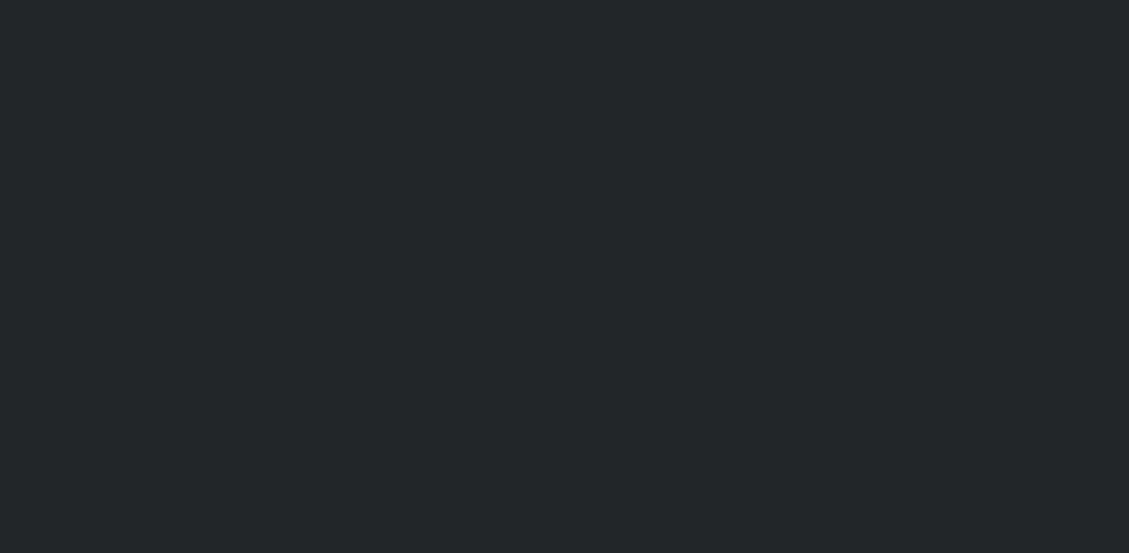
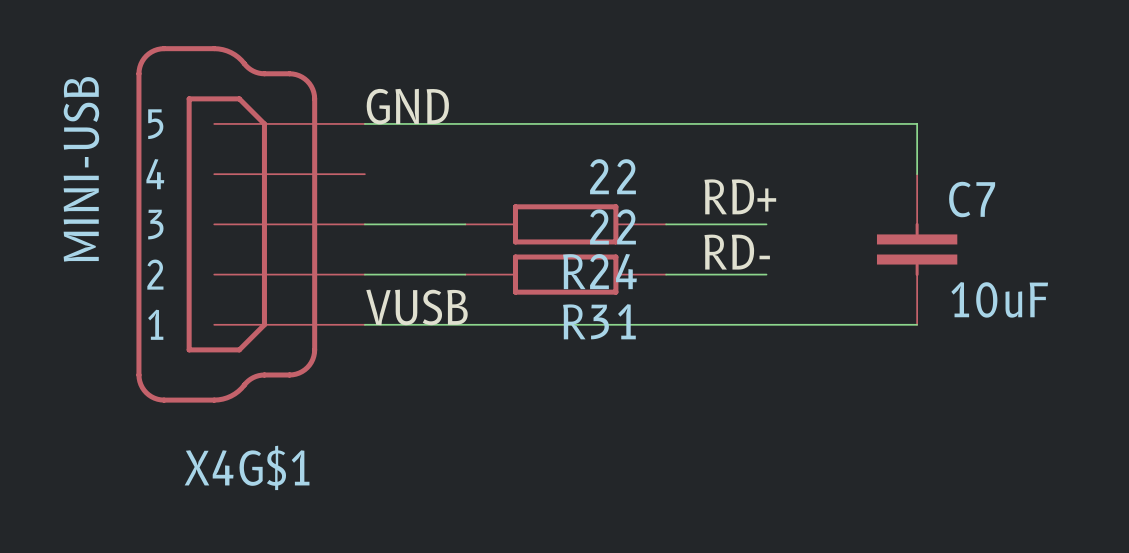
label: none -> GND (407, 106)
wire: none -> (364, 123) (917, 123) (917, 174)
label: none -> RD+ (740, 196)
X4G$1: none -> MINI-USB (250, 224)
wire: none -> (364, 224) (465, 224)
R24: none -> 22 (565, 224)
wire: none -> (666, 224) (766, 224)
C7: none -> 10uF (917, 249)
label: none -> RD- (737, 252)
wire: none -> (364, 274) (465, 274)
R31: none -> 22 (565, 274)
wire: none -> (666, 274) (766, 274)
label: none -> VUSB (416, 307)
wire: none -> (364, 324) (917, 324)

